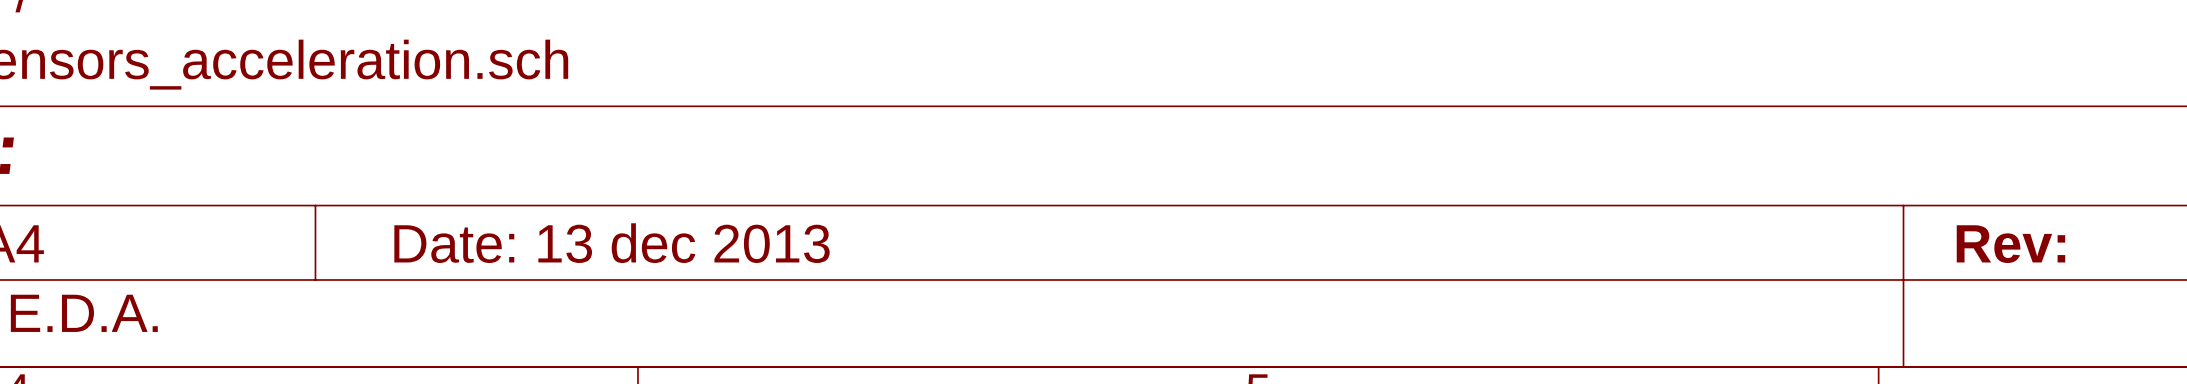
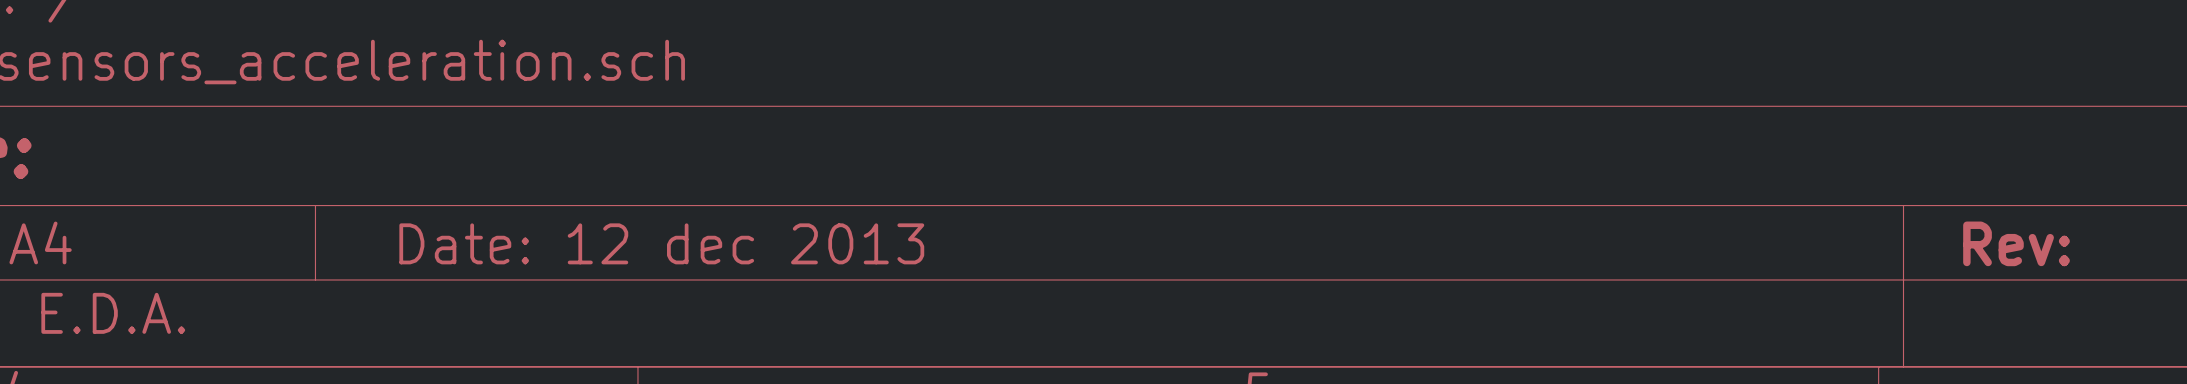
title block: Date: 13 dec 2013 (612, 243) -> Date: 12 dec 2013 (661, 243)

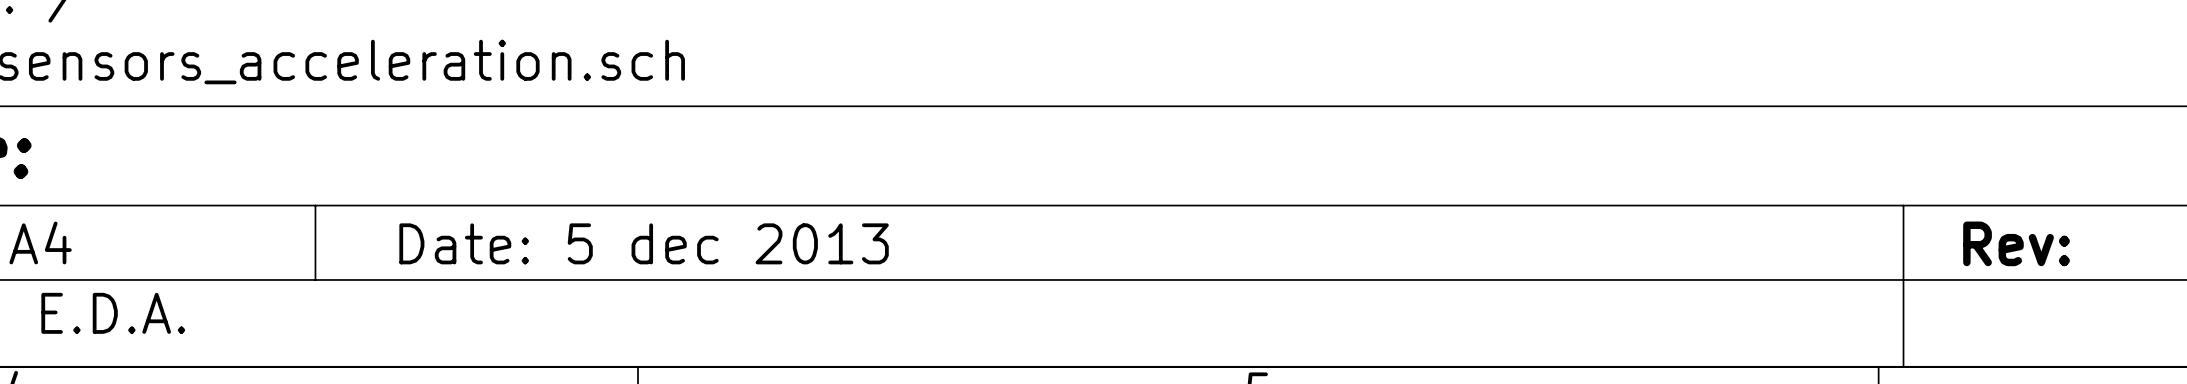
title block: Date: 12 dec 2013 (661, 243) -> Date: 5 dec 2013 (644, 243)

